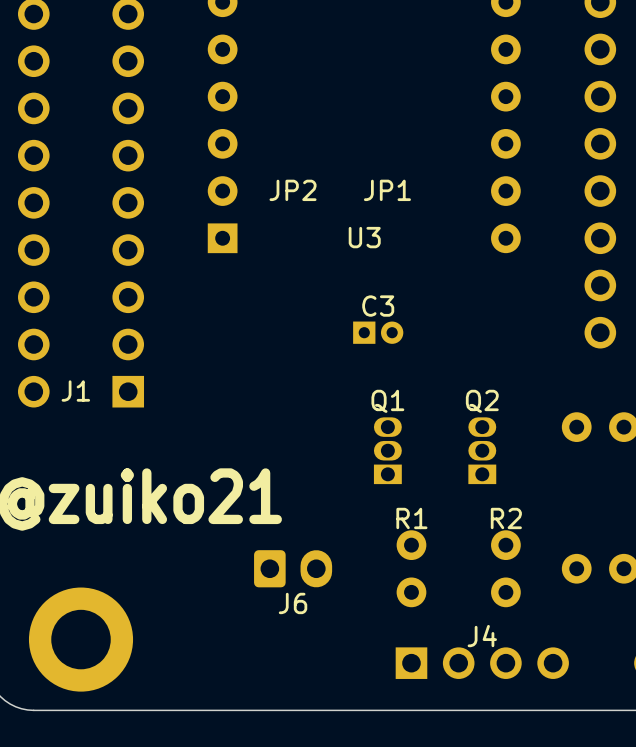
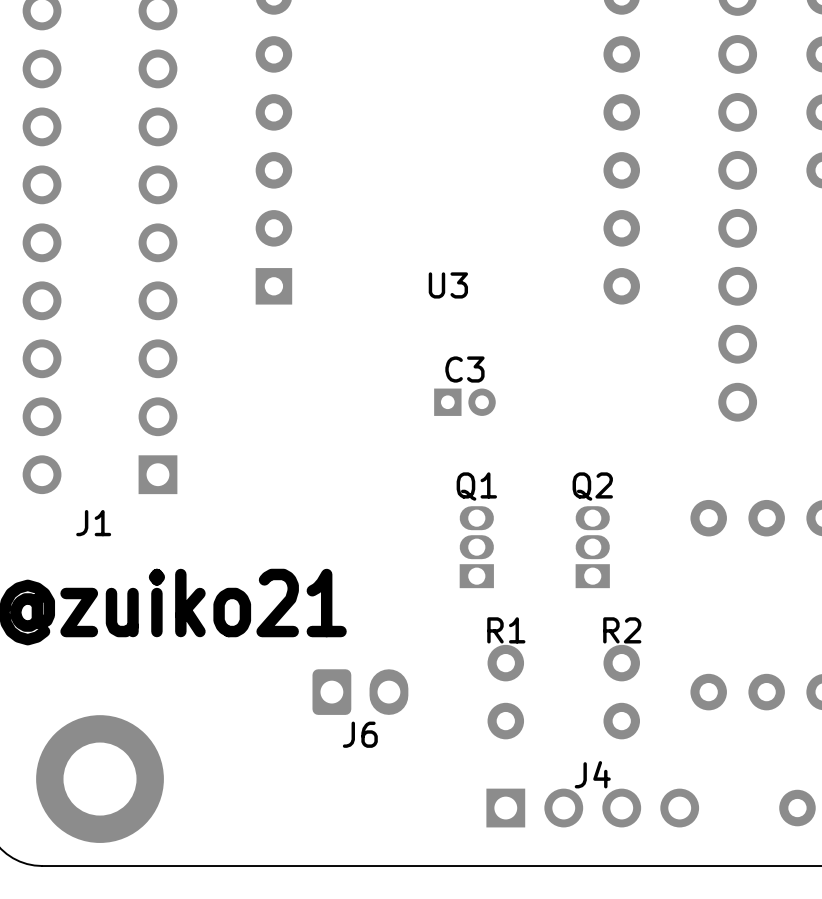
JP2: (293, 190) -> none
JP1: (387, 190) -> none
J1 name position: J1 (75, 391) -> J1 (93, 523)

